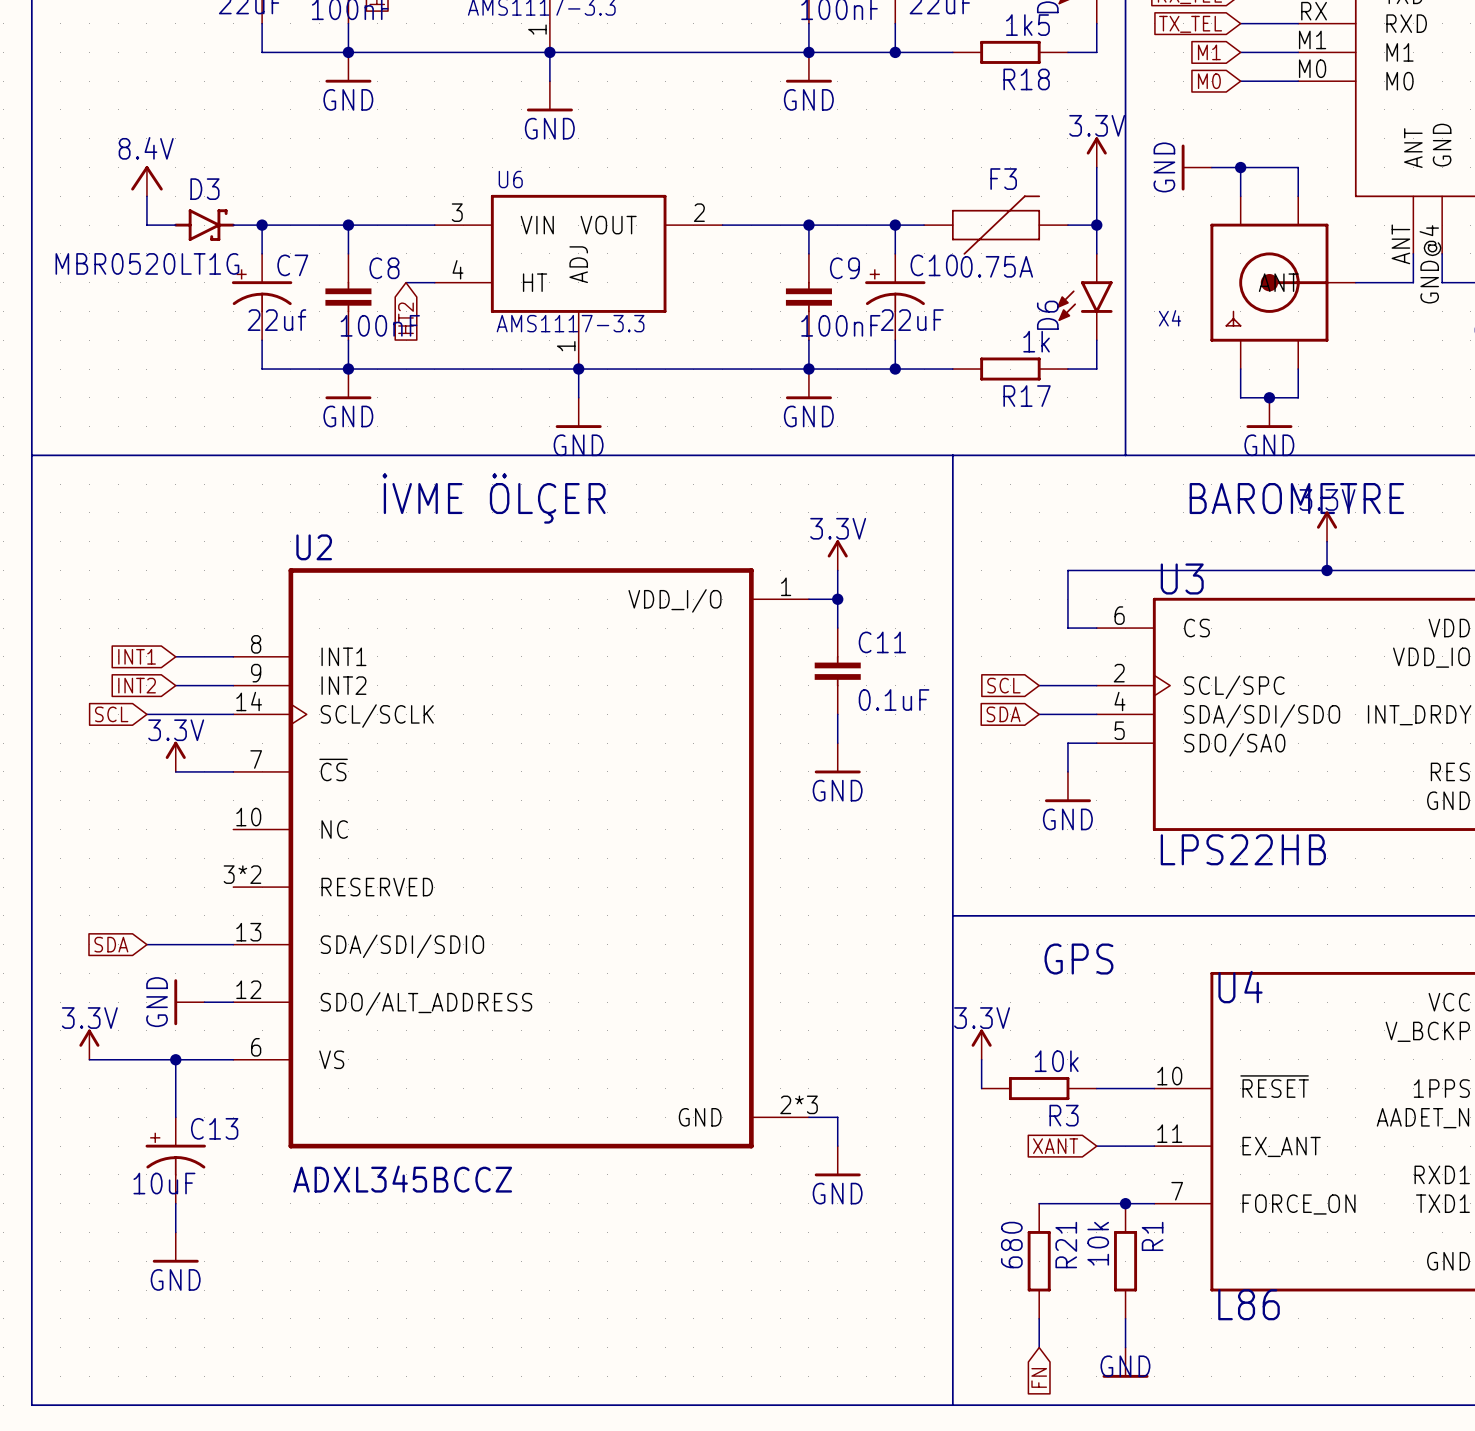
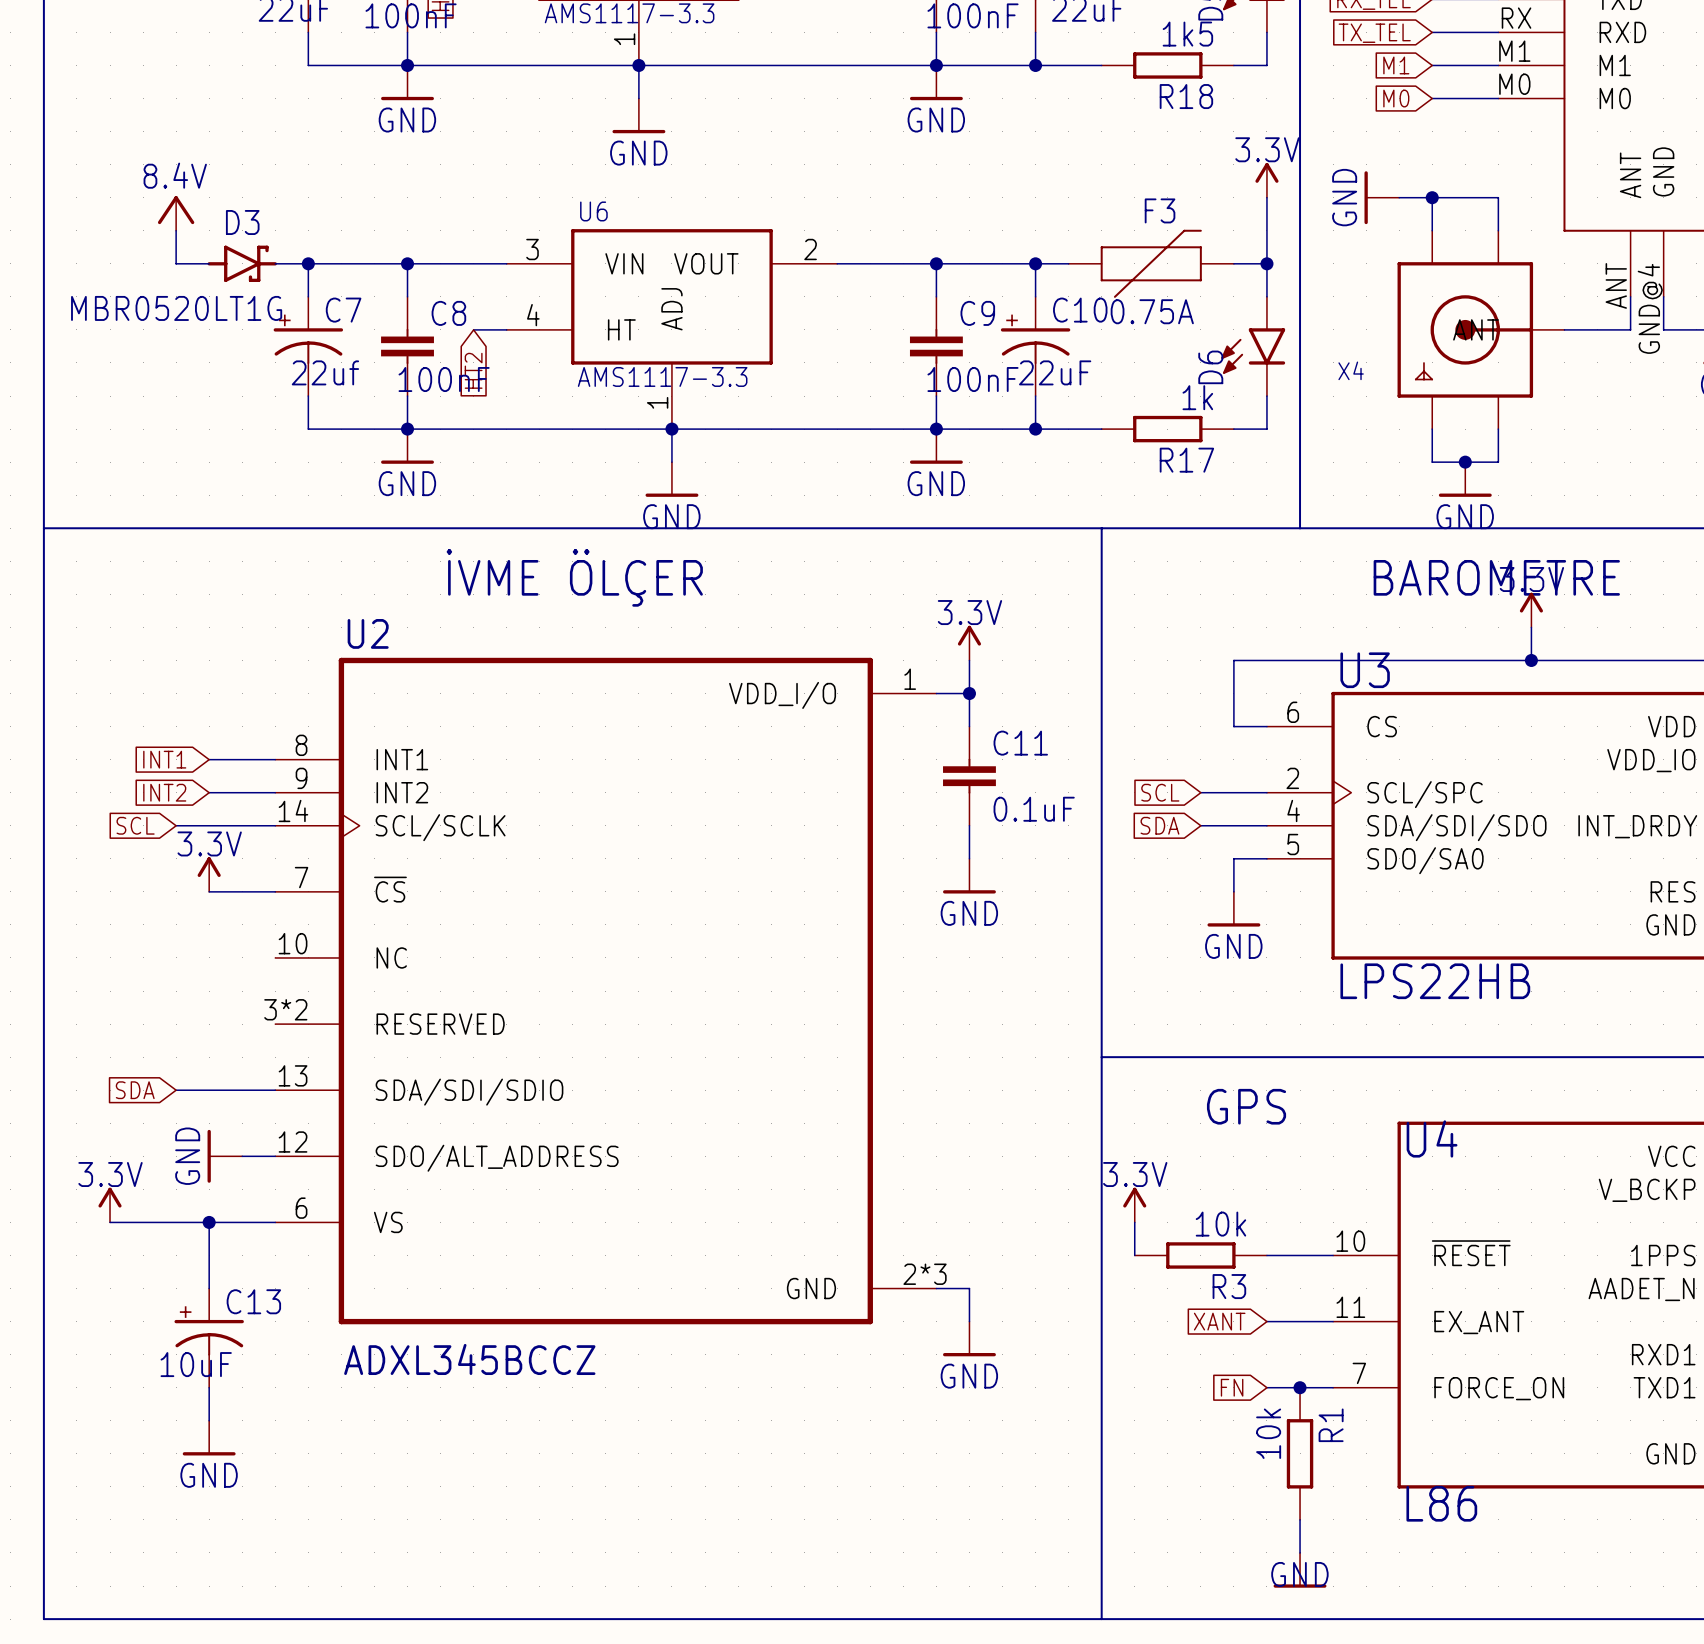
wire: (1039, 1203) (1096, 1203) -> none
R21: 680 (1039, 1261) -> none
wire: (1039, 1318) (1039, 1347) -> none
global label rotation: 0° (1039, 1377) -> 90° clockwise (1232, 1387)
global label position: FN (1039, 1377) -> FN (1232, 1387)

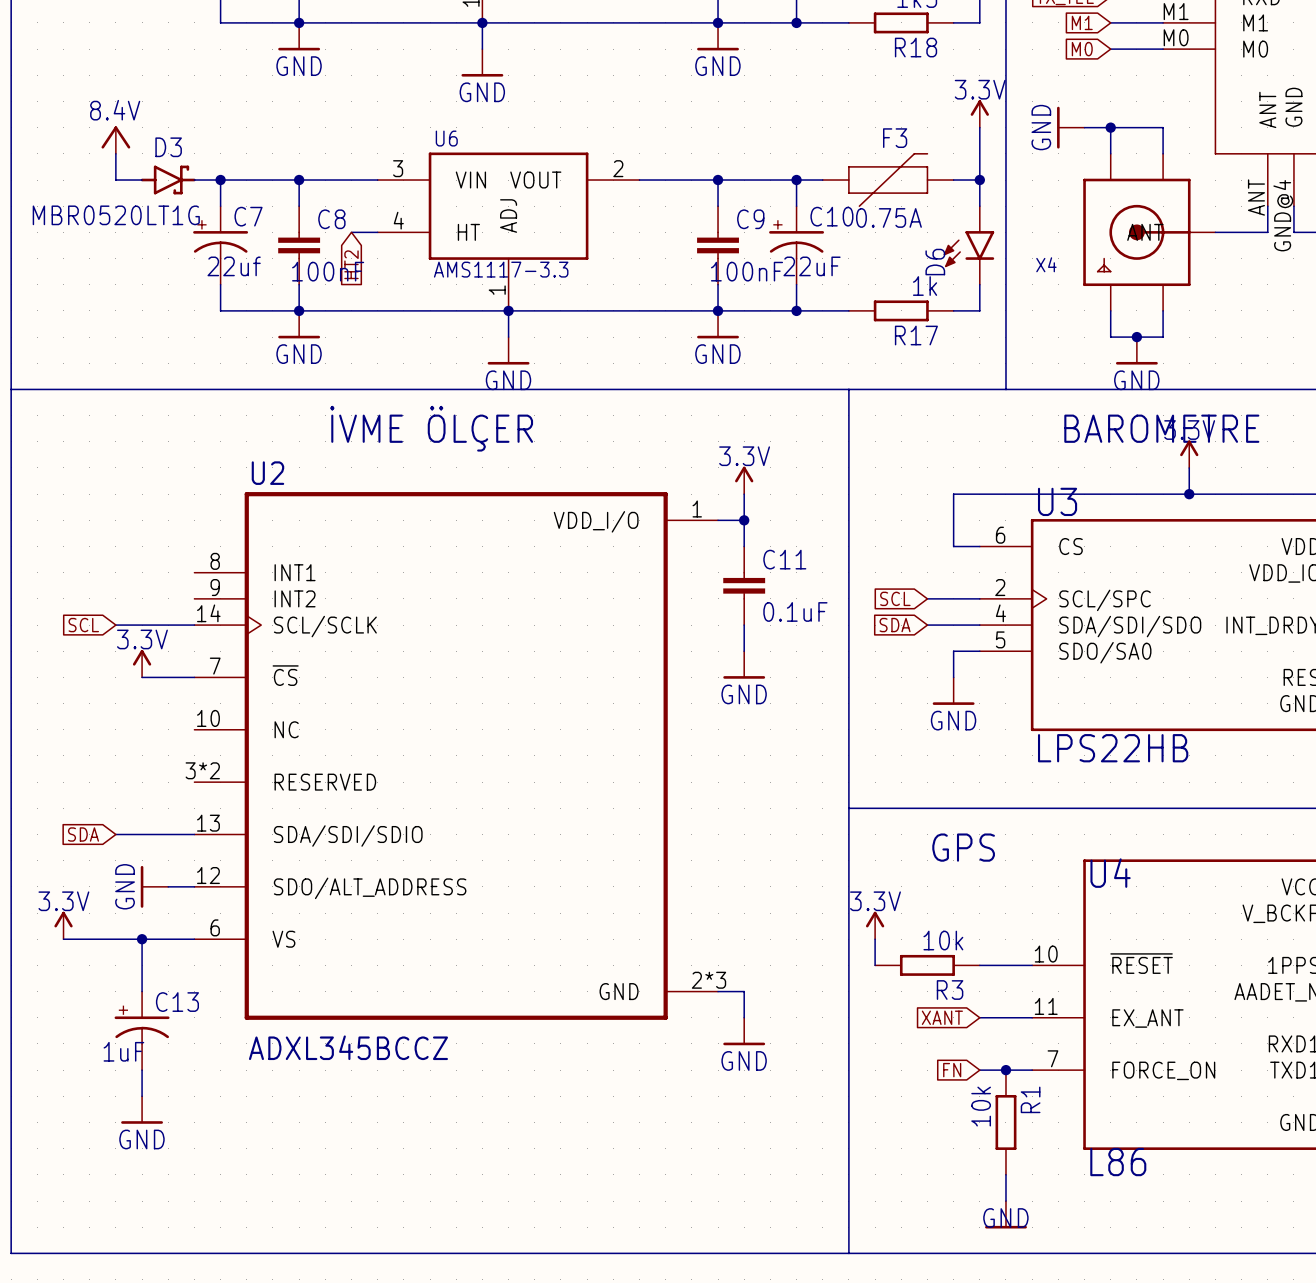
global label: INT1 (164, 759) -> none
wire: (209, 759) (275, 759) -> none
global label: INT2 (164, 792) -> none
wire: (209, 792) (275, 792) -> none
C13 value: 10uF (196, 1364) -> 1uF (123, 1051)

